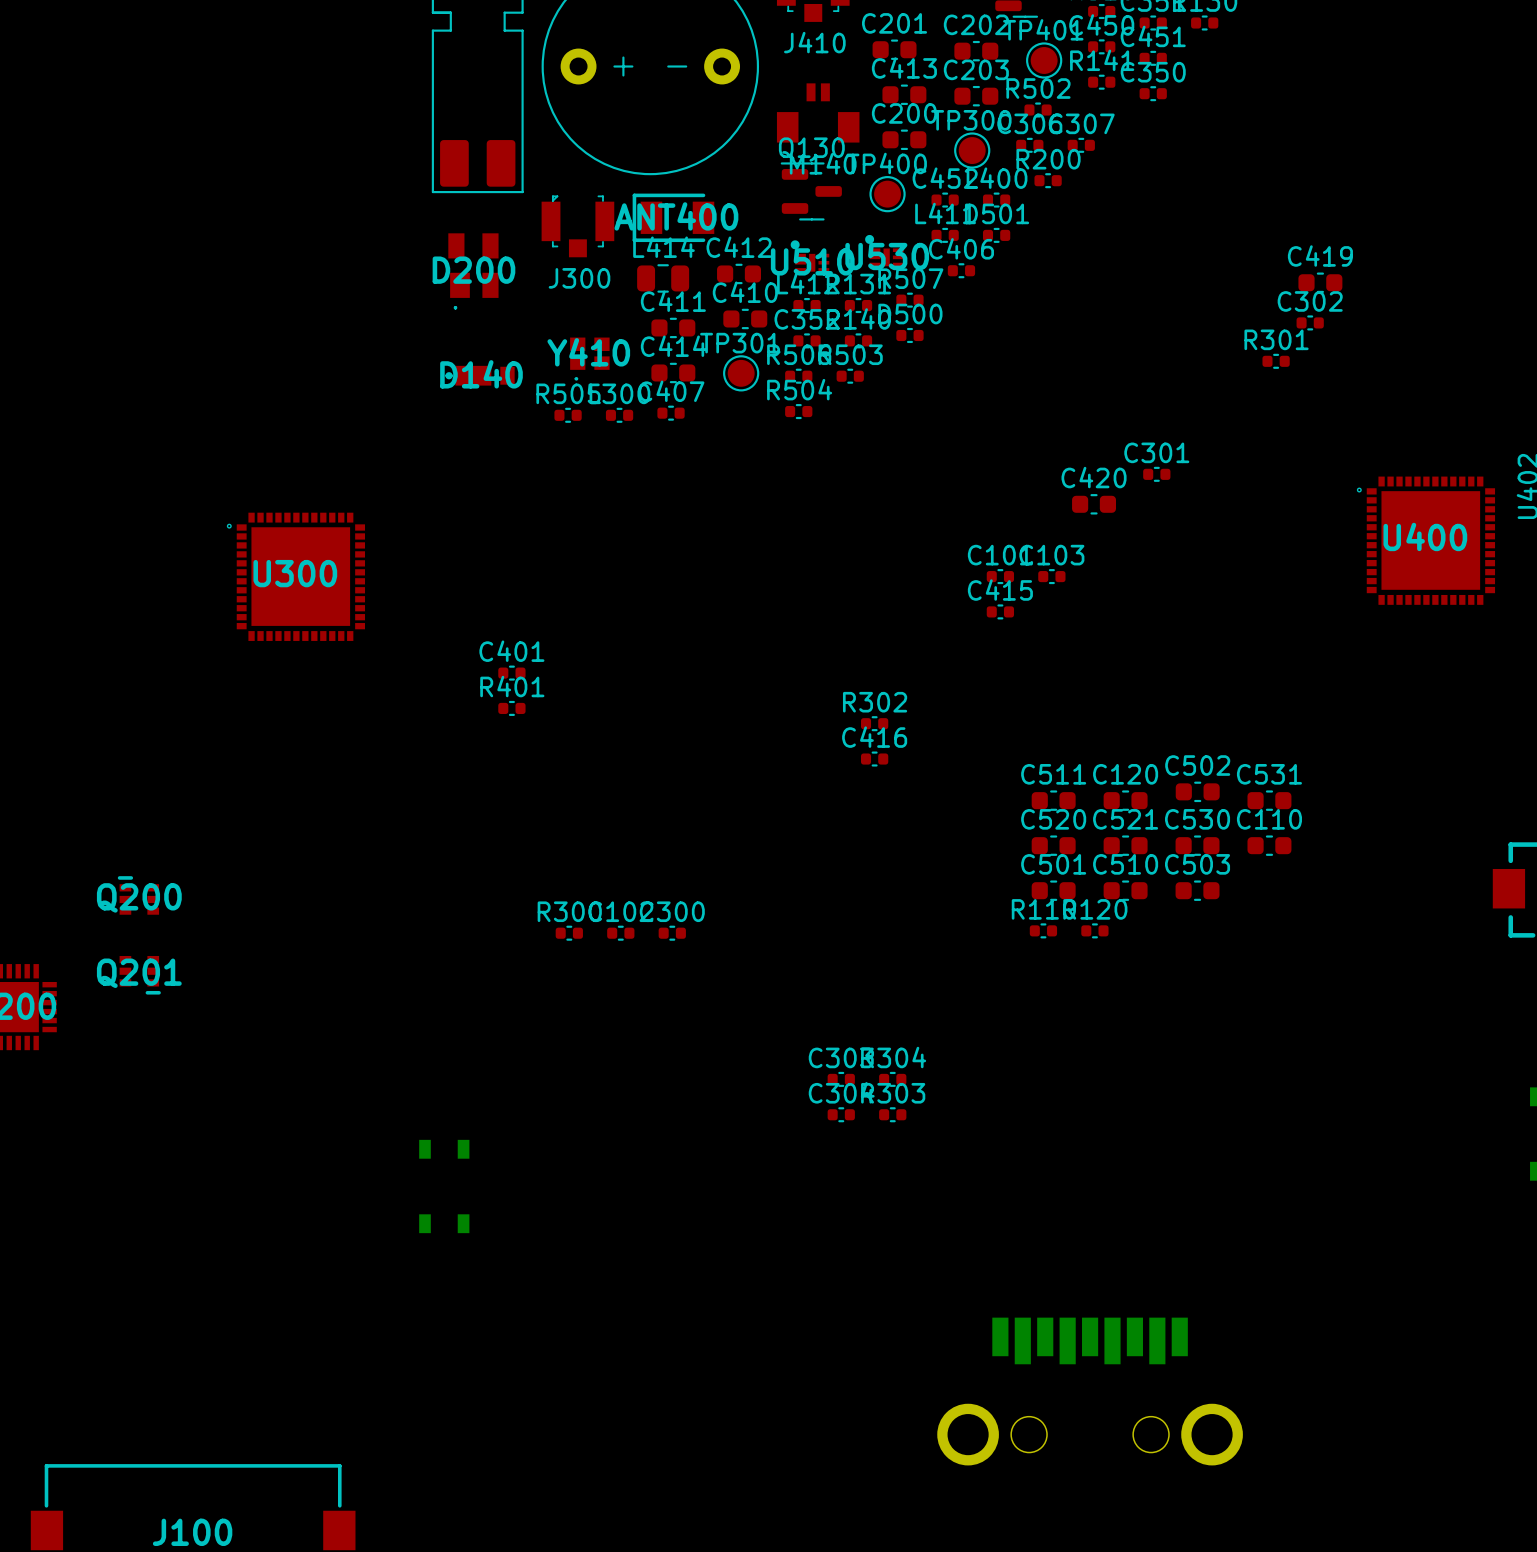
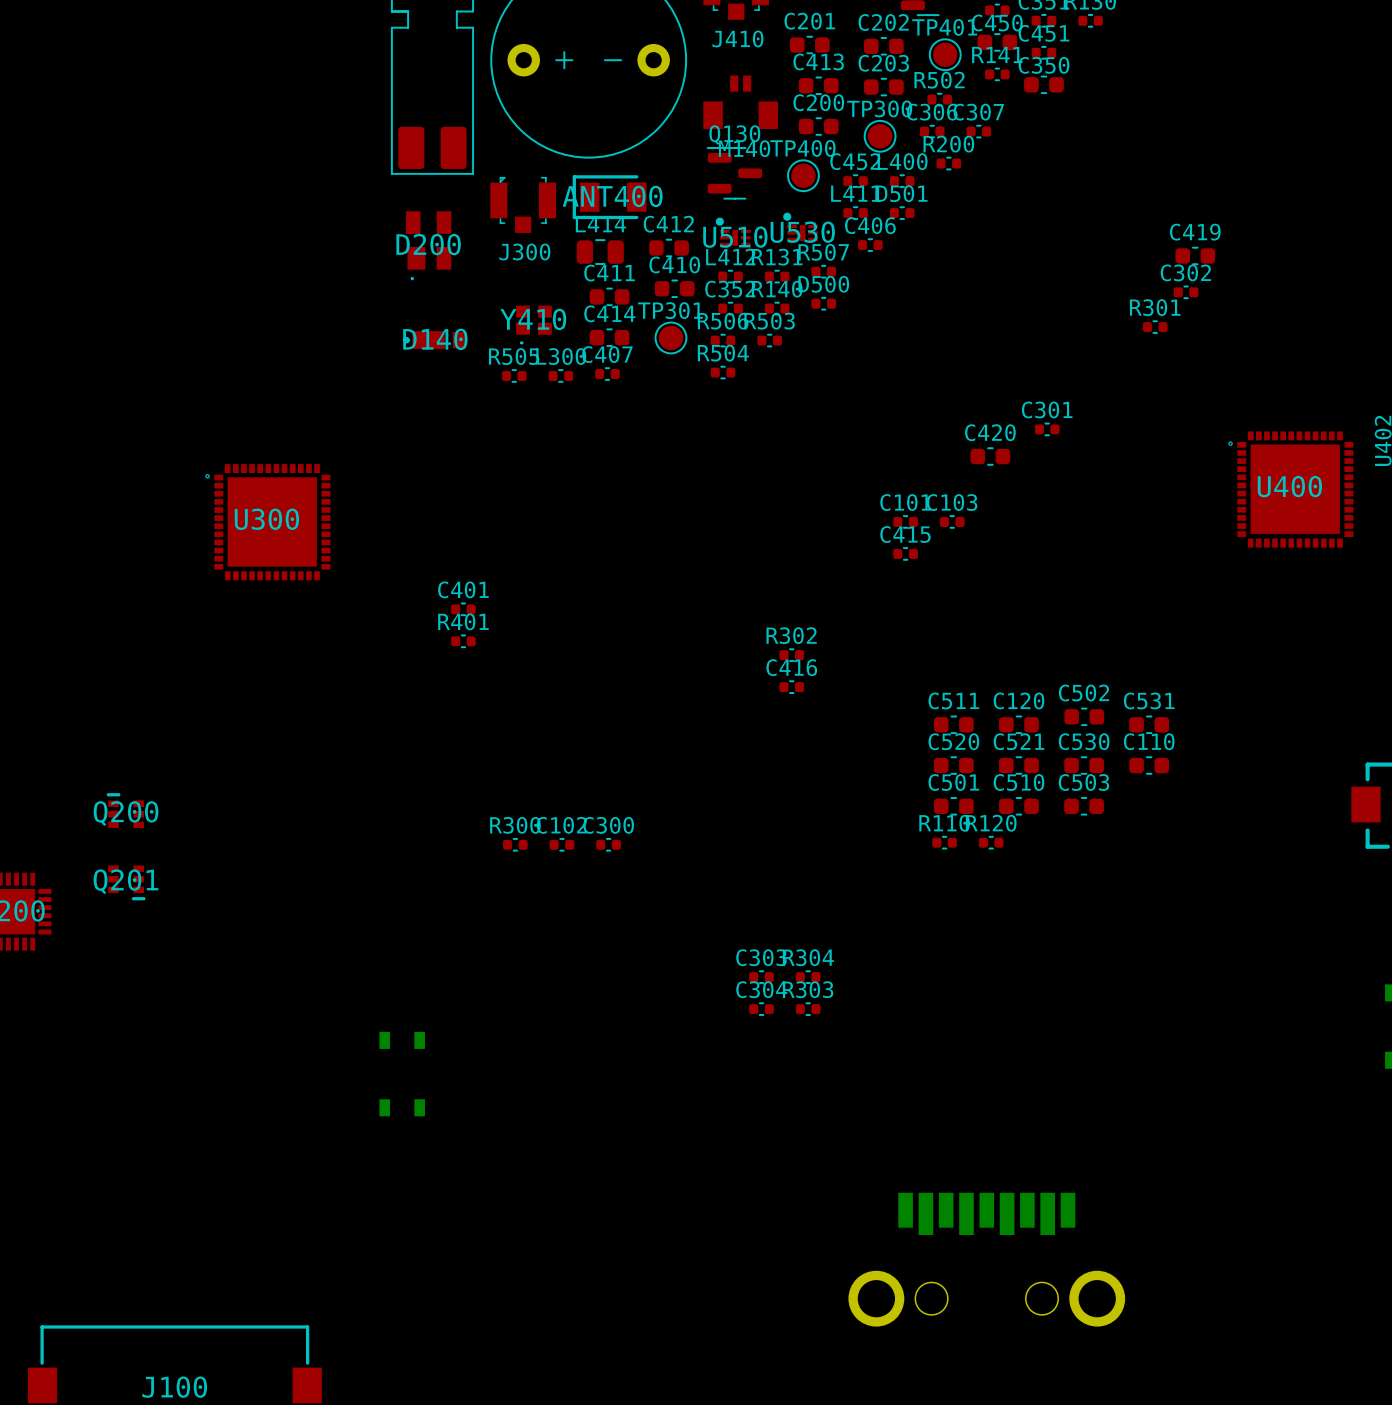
C450 footprint: [1088, 39, 1116, 55] -> [977, 33, 1018, 52]
C350 footprint: [1139, 86, 1167, 102] -> [1024, 75, 1064, 95]

